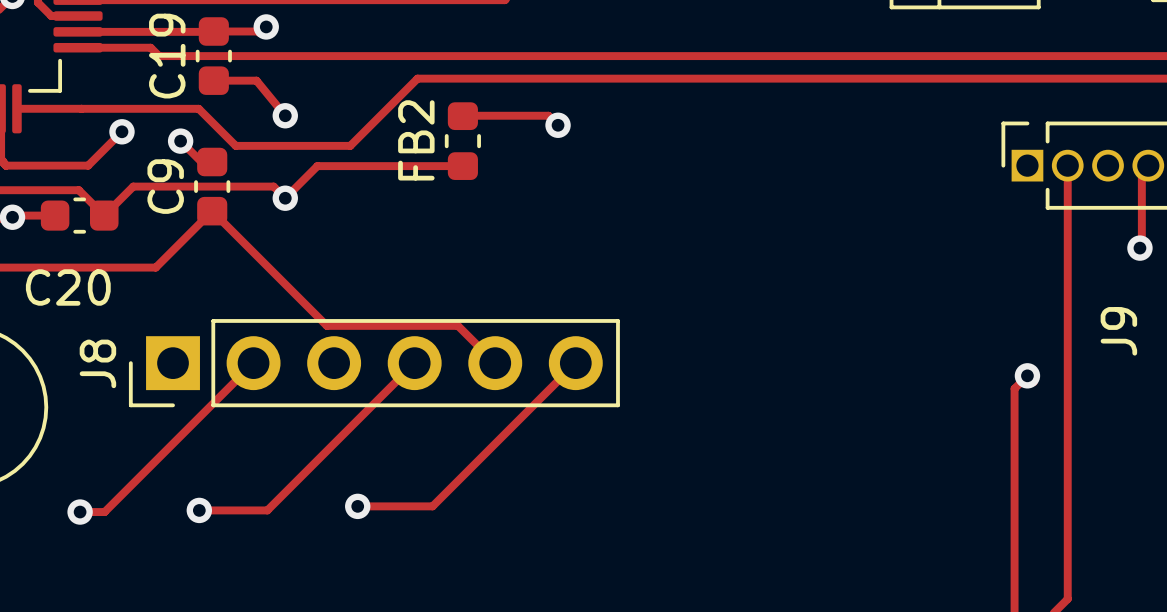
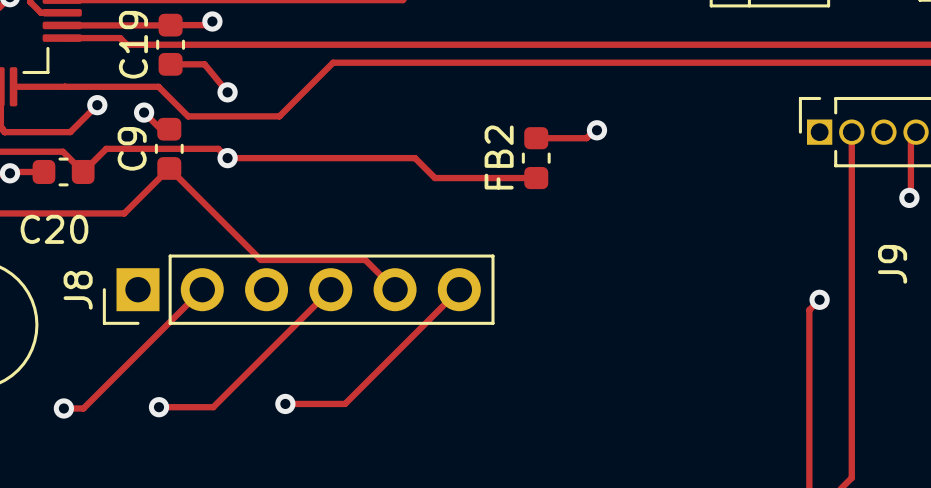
track: (469, 115) (548, 115) (558, 125) -> none
via: (558, 125) -> none
FB2 position: (462, 141) -> (536, 158)
track: none -> (596, 127) (596, 130) (594, 130) (586, 138) (536, 138)
via: none -> (596, 130)
track: (462, 166) (317, 166) (285, 198) -> (536, 178) (434, 178) (415, 158) (227, 158)

